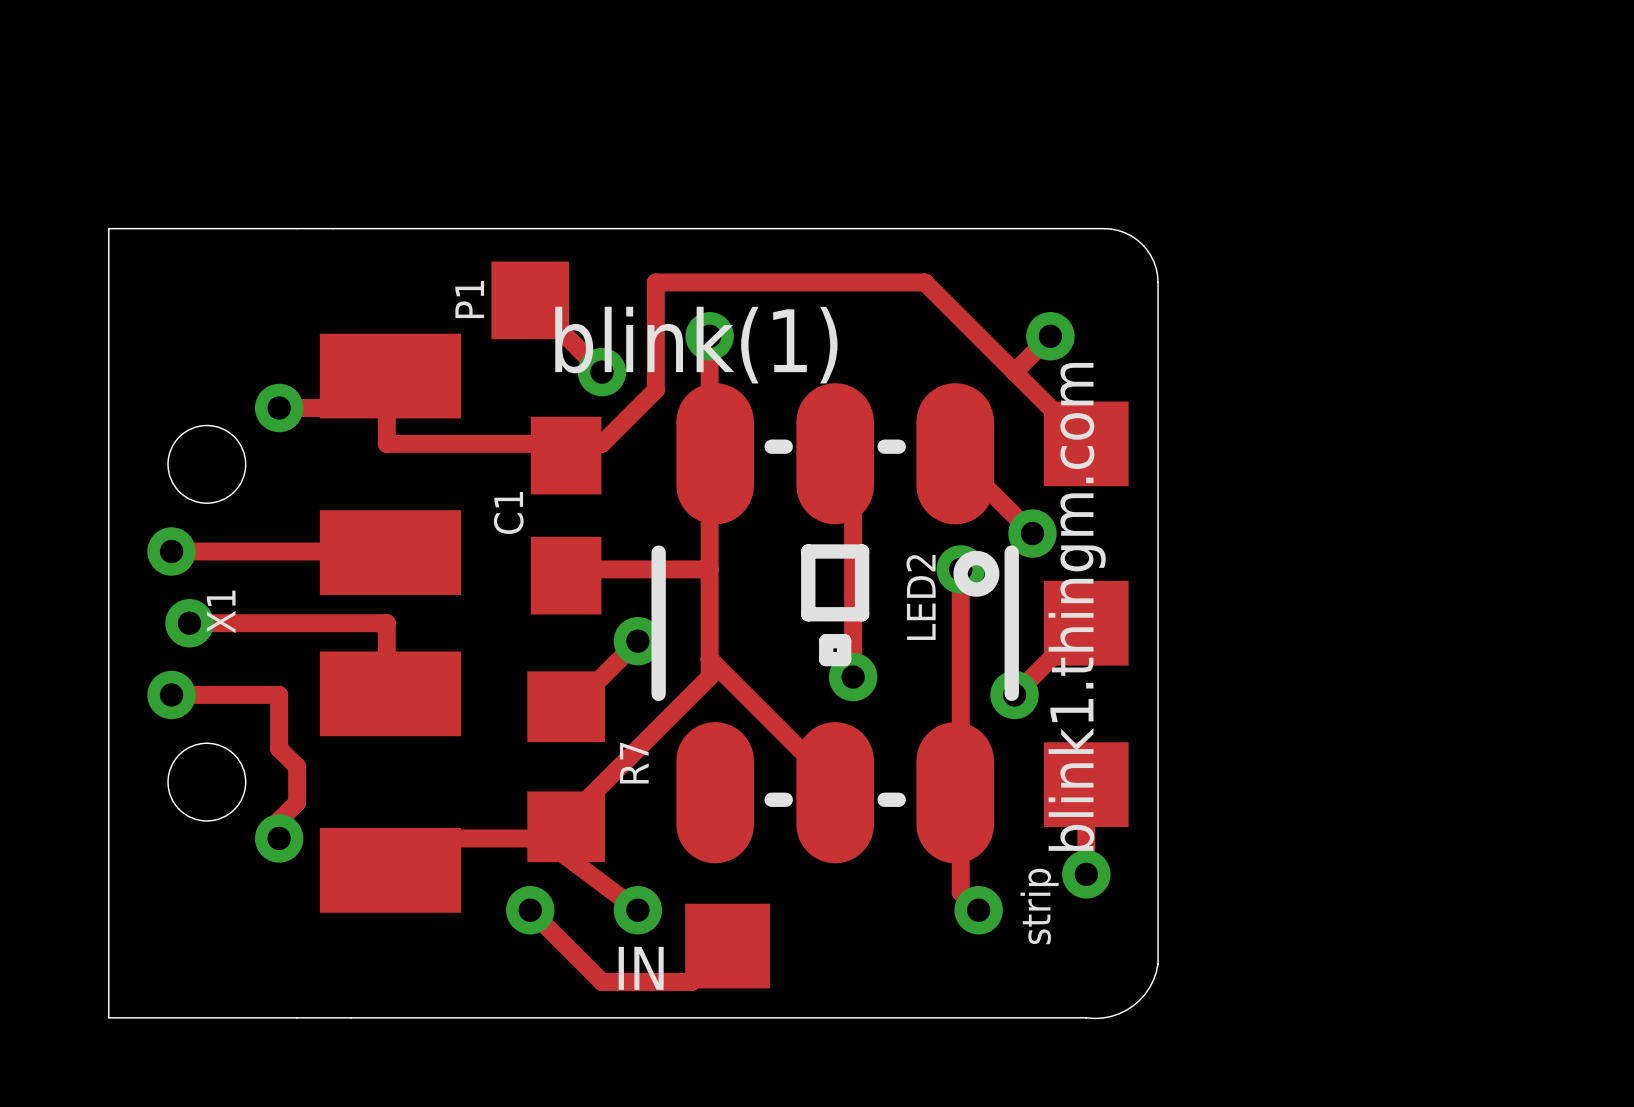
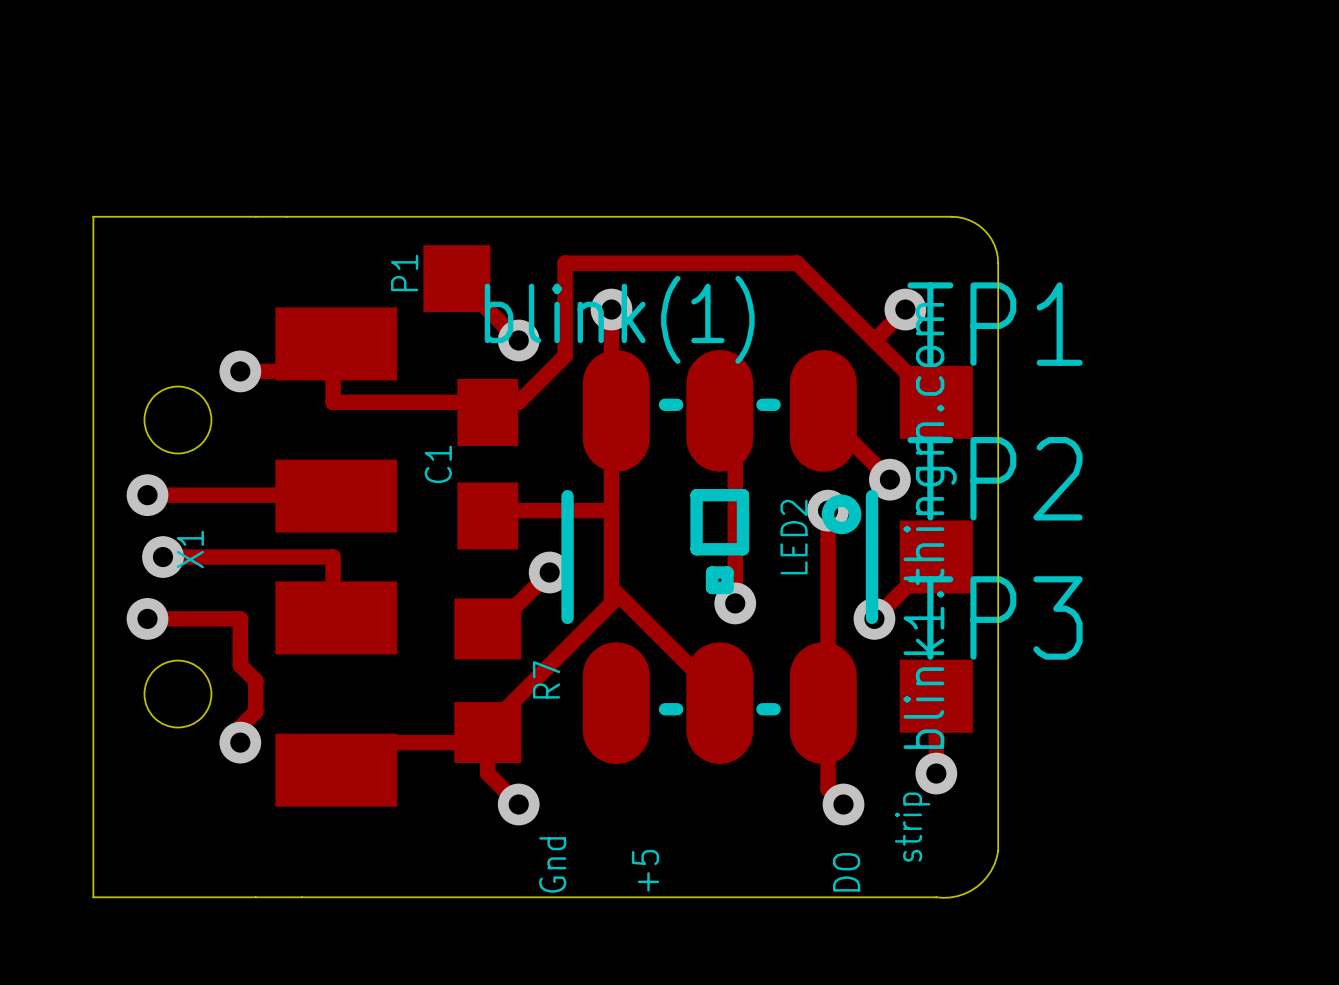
TP1 name: none -> TP1 (995, 324)
TP2 name: none -> TP2 (995, 478)
TP3 name: none -> TP3 (995, 617)
track: (566, 856) (637, 910) -> (487, 758) (487, 773) (518, 804)
text position: strip (1039, 906) -> strip (912, 827)
track: (530, 910) (602, 981) (691, 981) (727, 946) -> none
via: (530, 910) -> none
via position: (637, 910) -> (518, 804)
IN: (727, 946) -> none
text: none -> Gnd (552, 864)
text: none -> DO (846, 872)
text: none -> +5 (645, 870)

